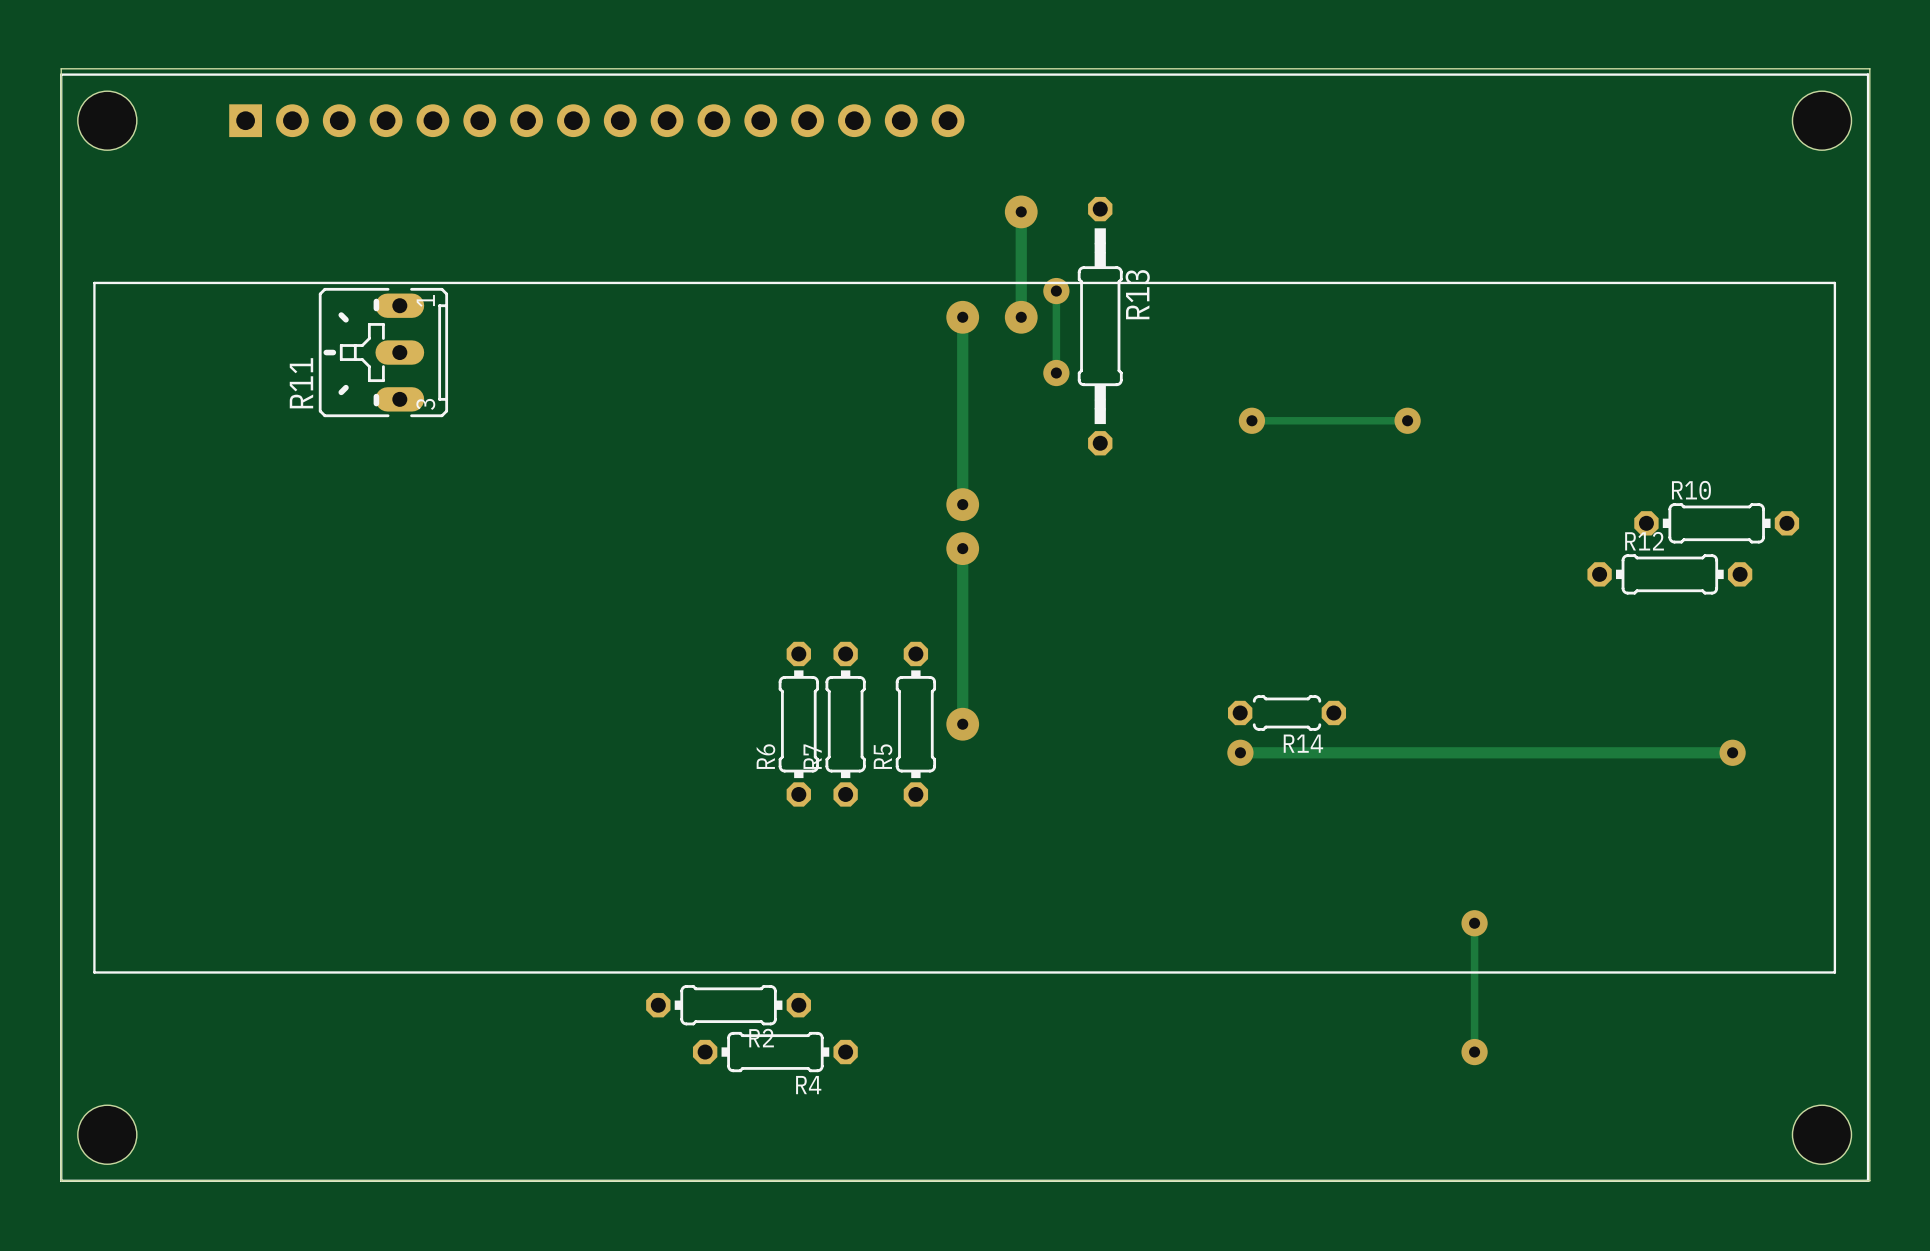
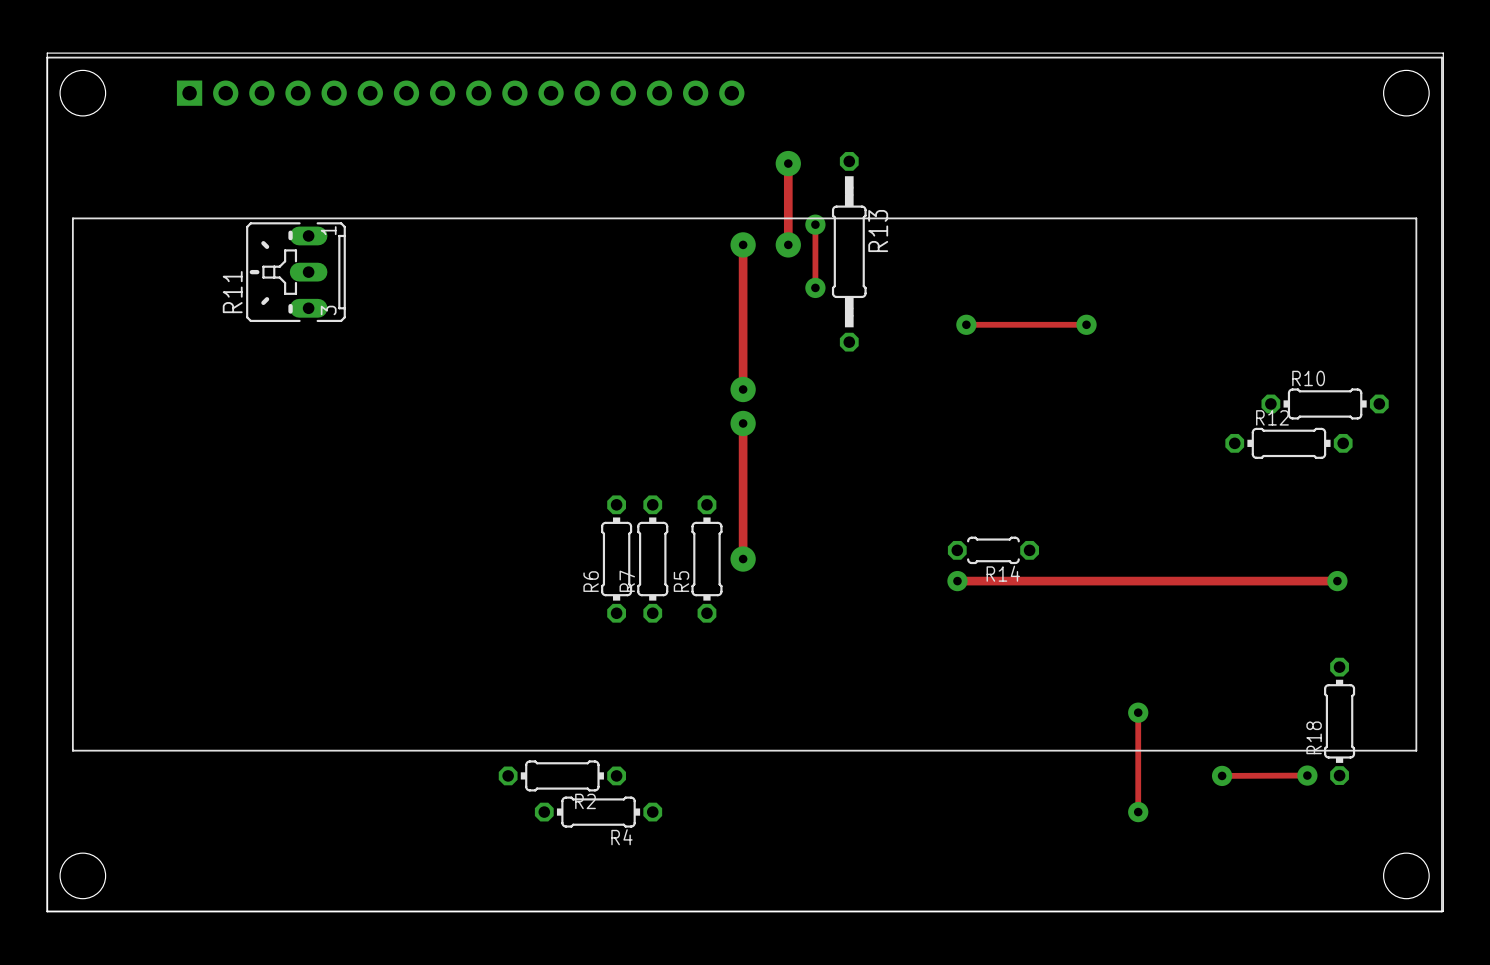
R18: none -> (1339, 721)
track: none -> (1307, 775) (1222, 775)
via: none -> (1307, 775)
via: none -> (1222, 775)

